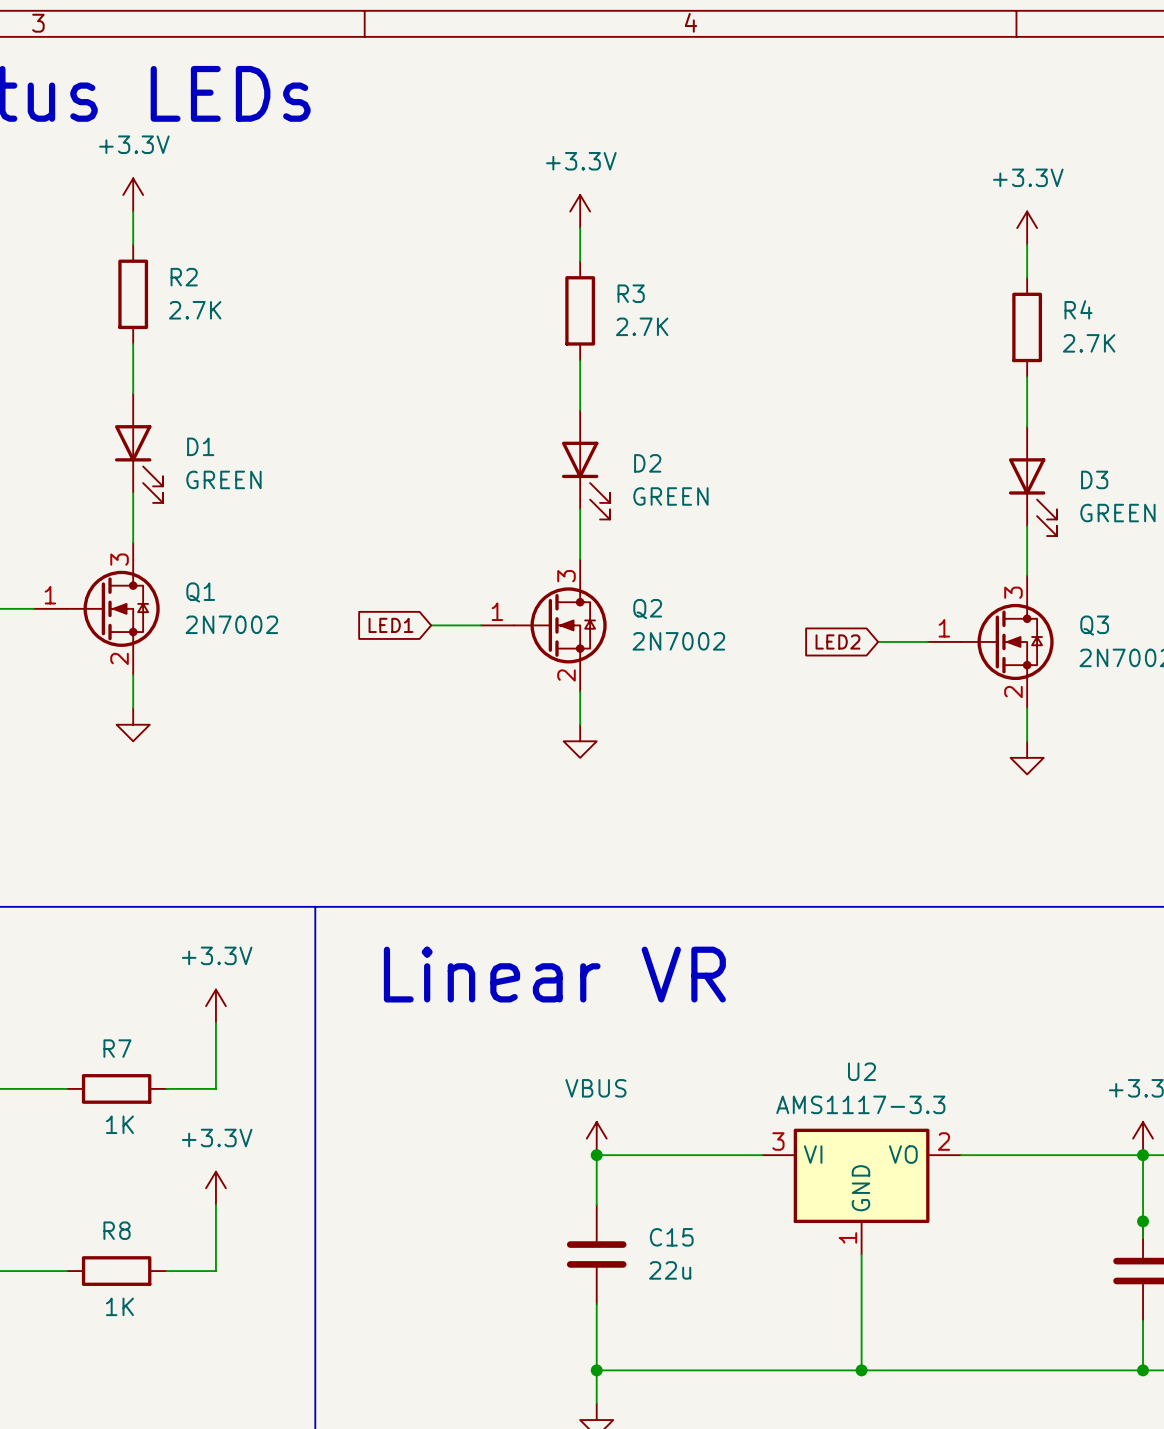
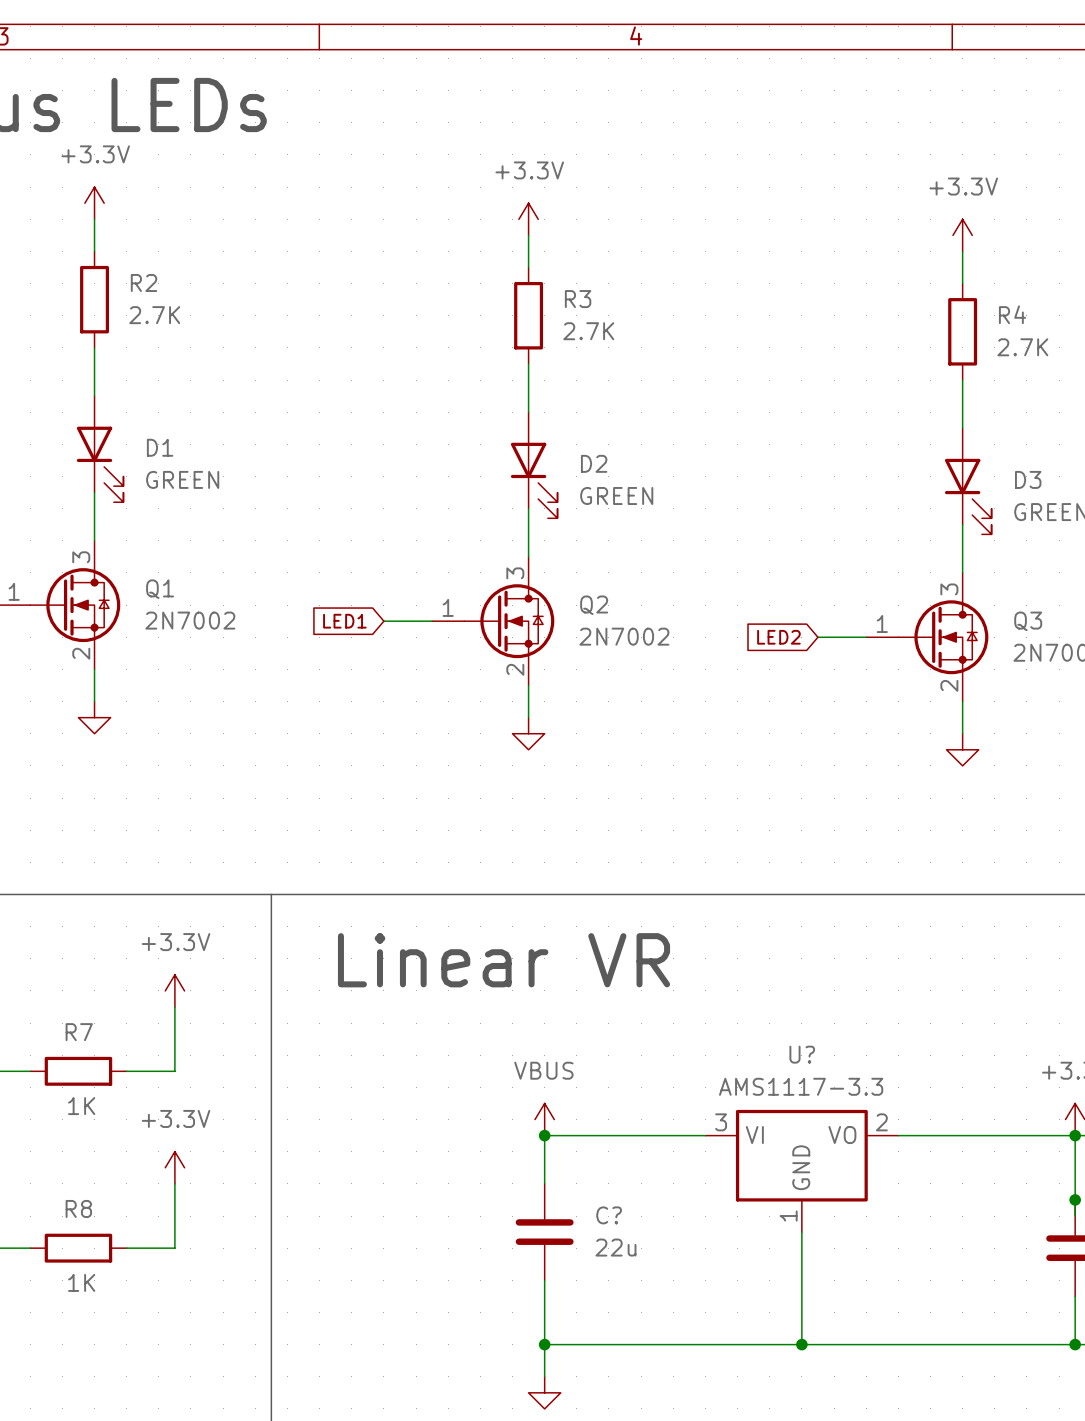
U2 name: U2 (861, 1071) -> U? (802, 1054)
C15 name: C15 (671, 1237) -> C? (609, 1215)

